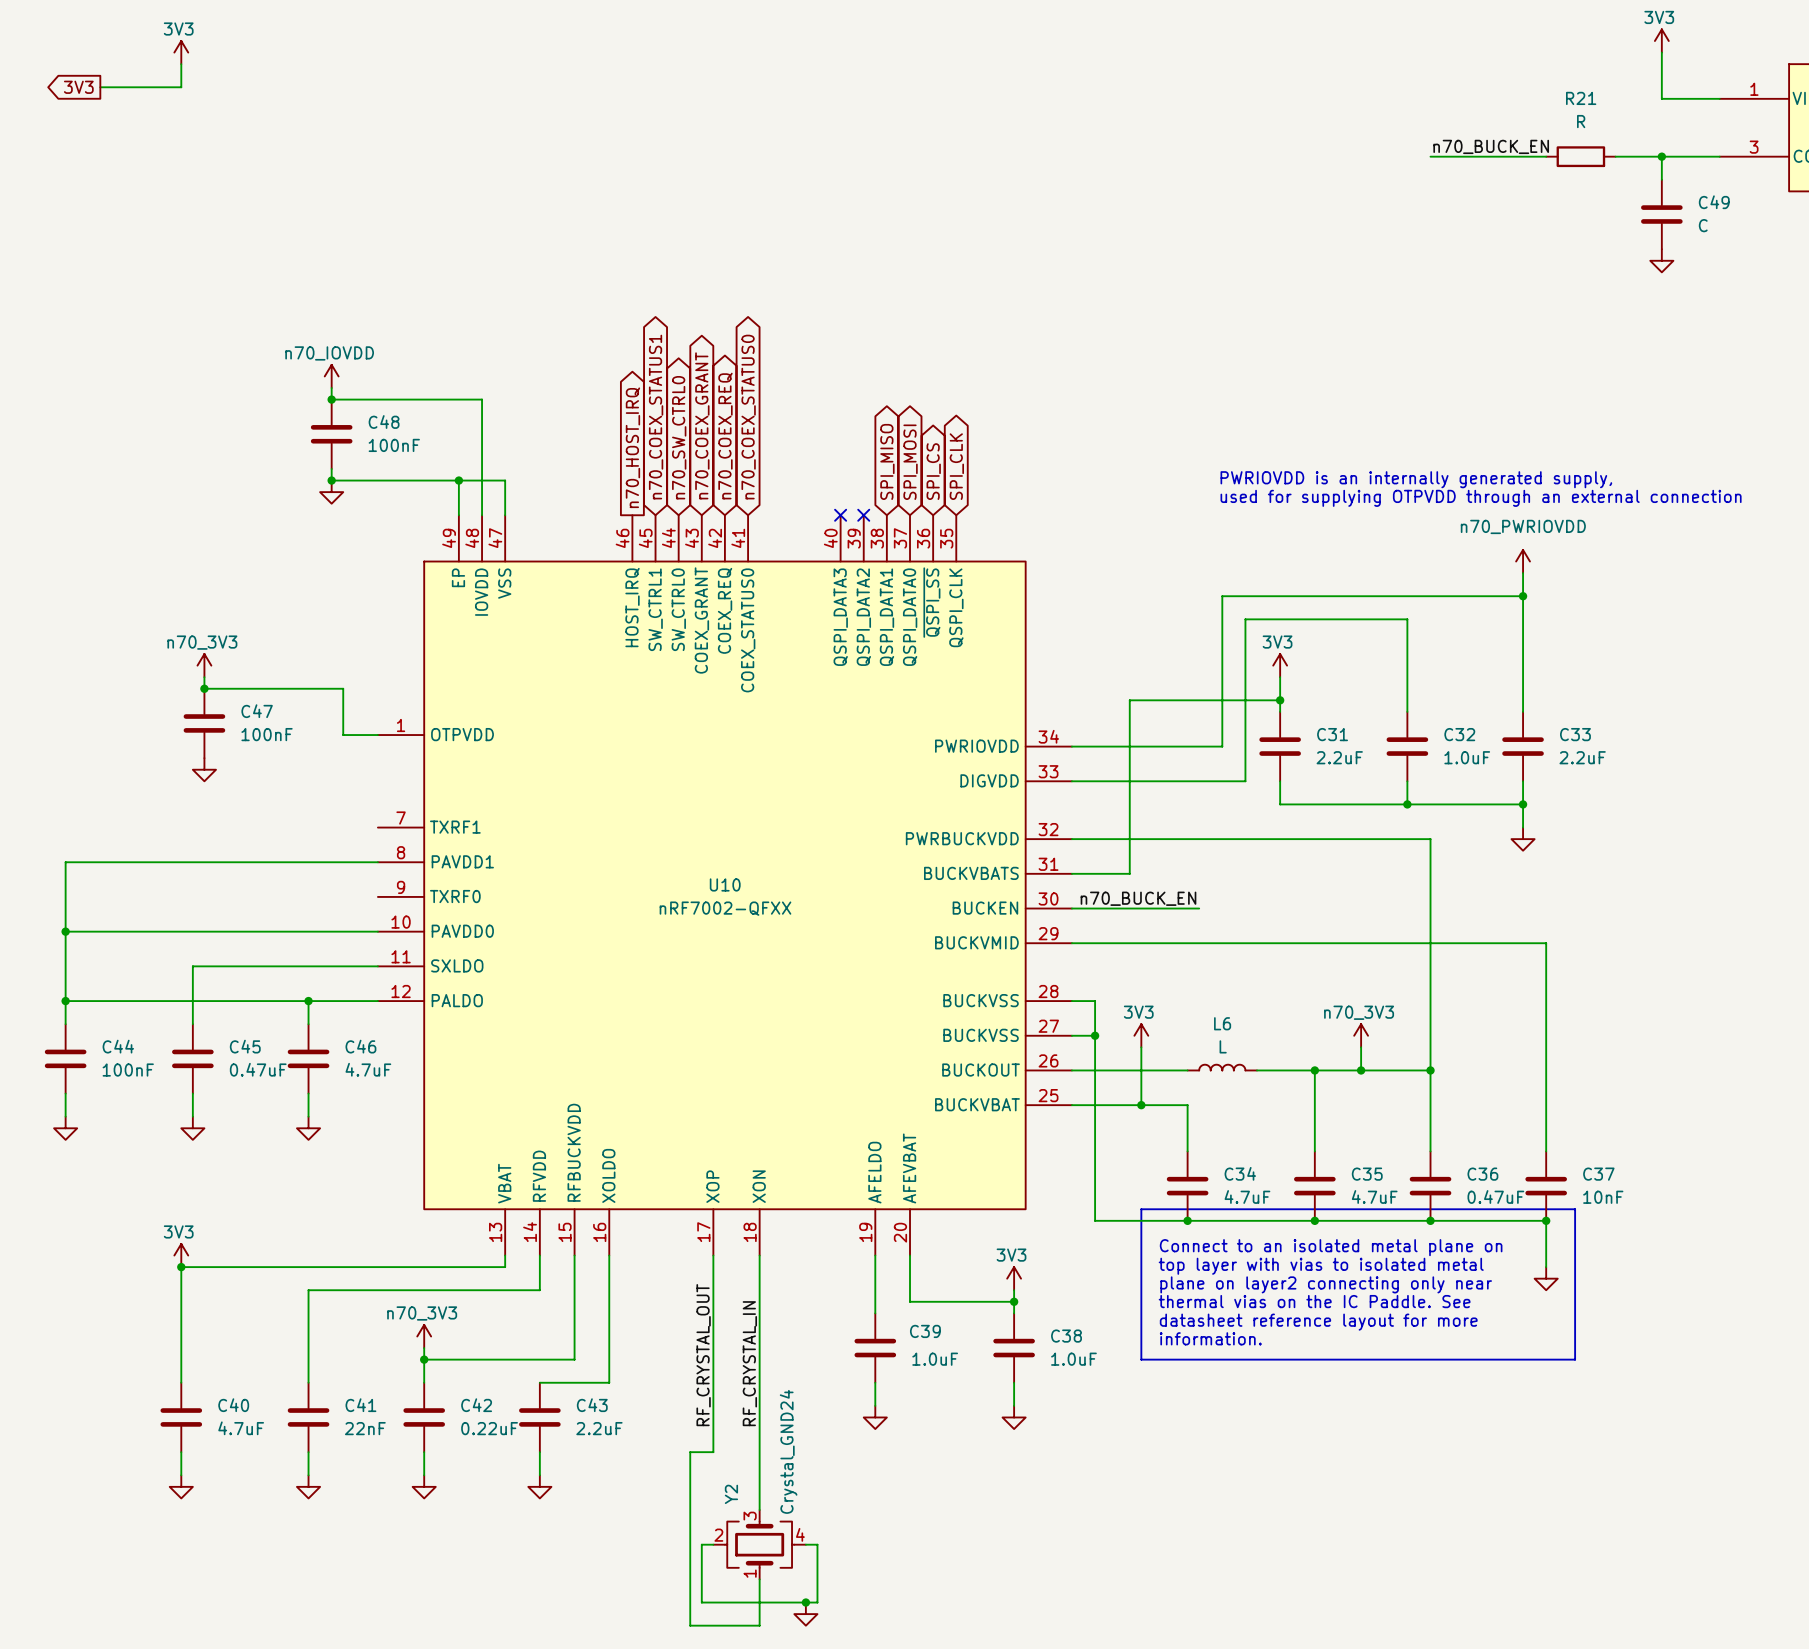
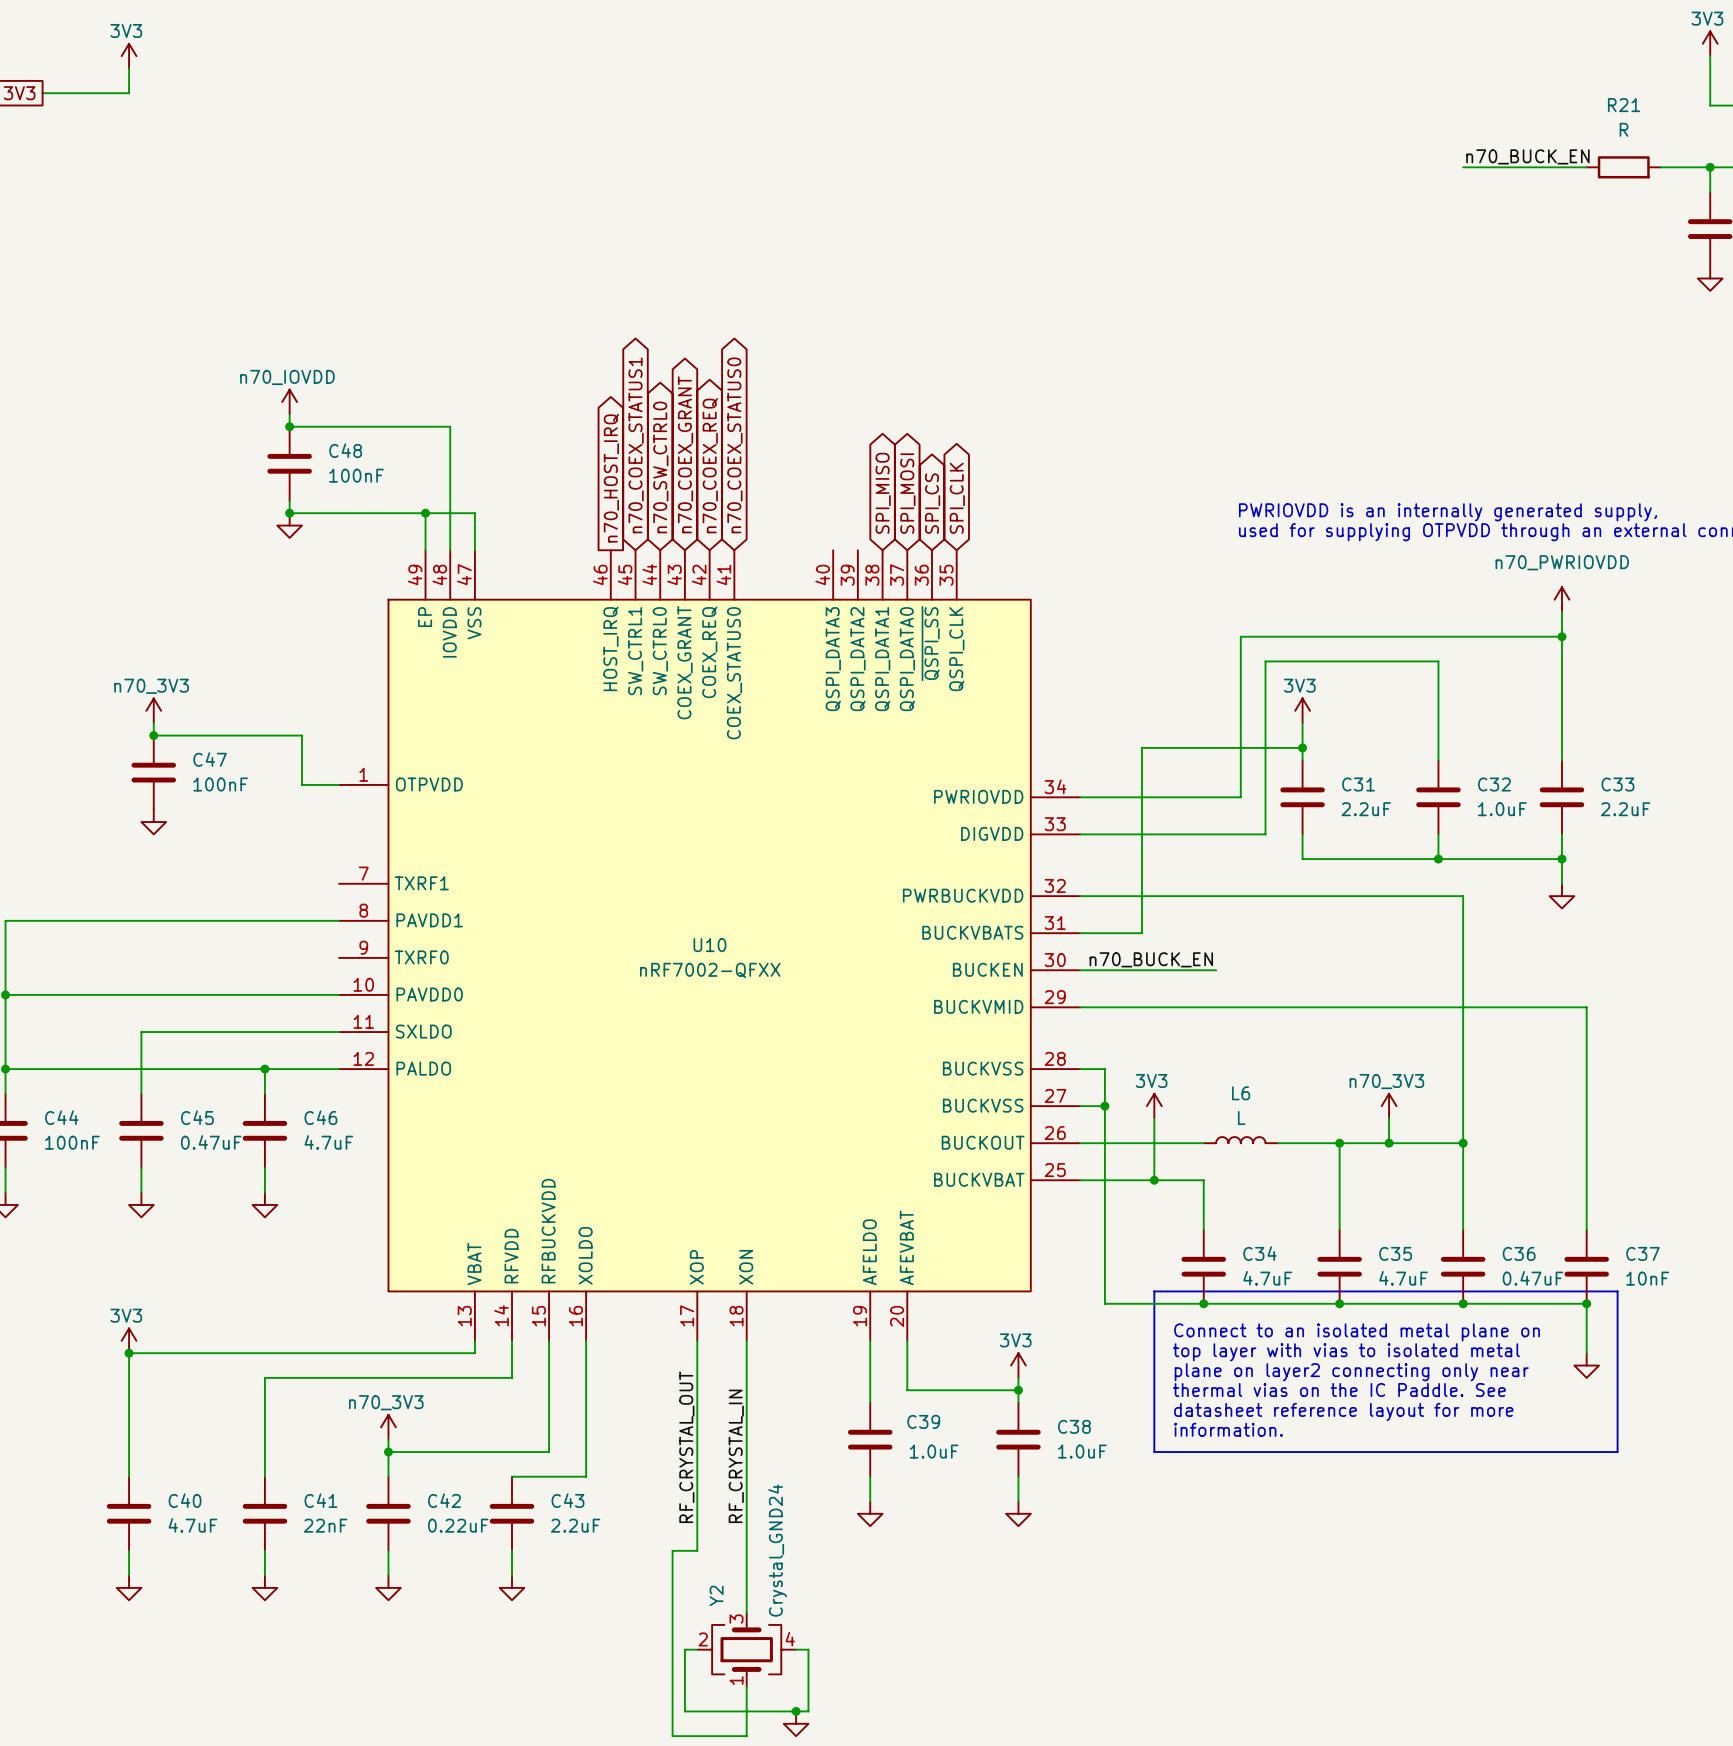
no-connect mark: (840, 515) -> none
no-connect mark: (863, 515) -> none

